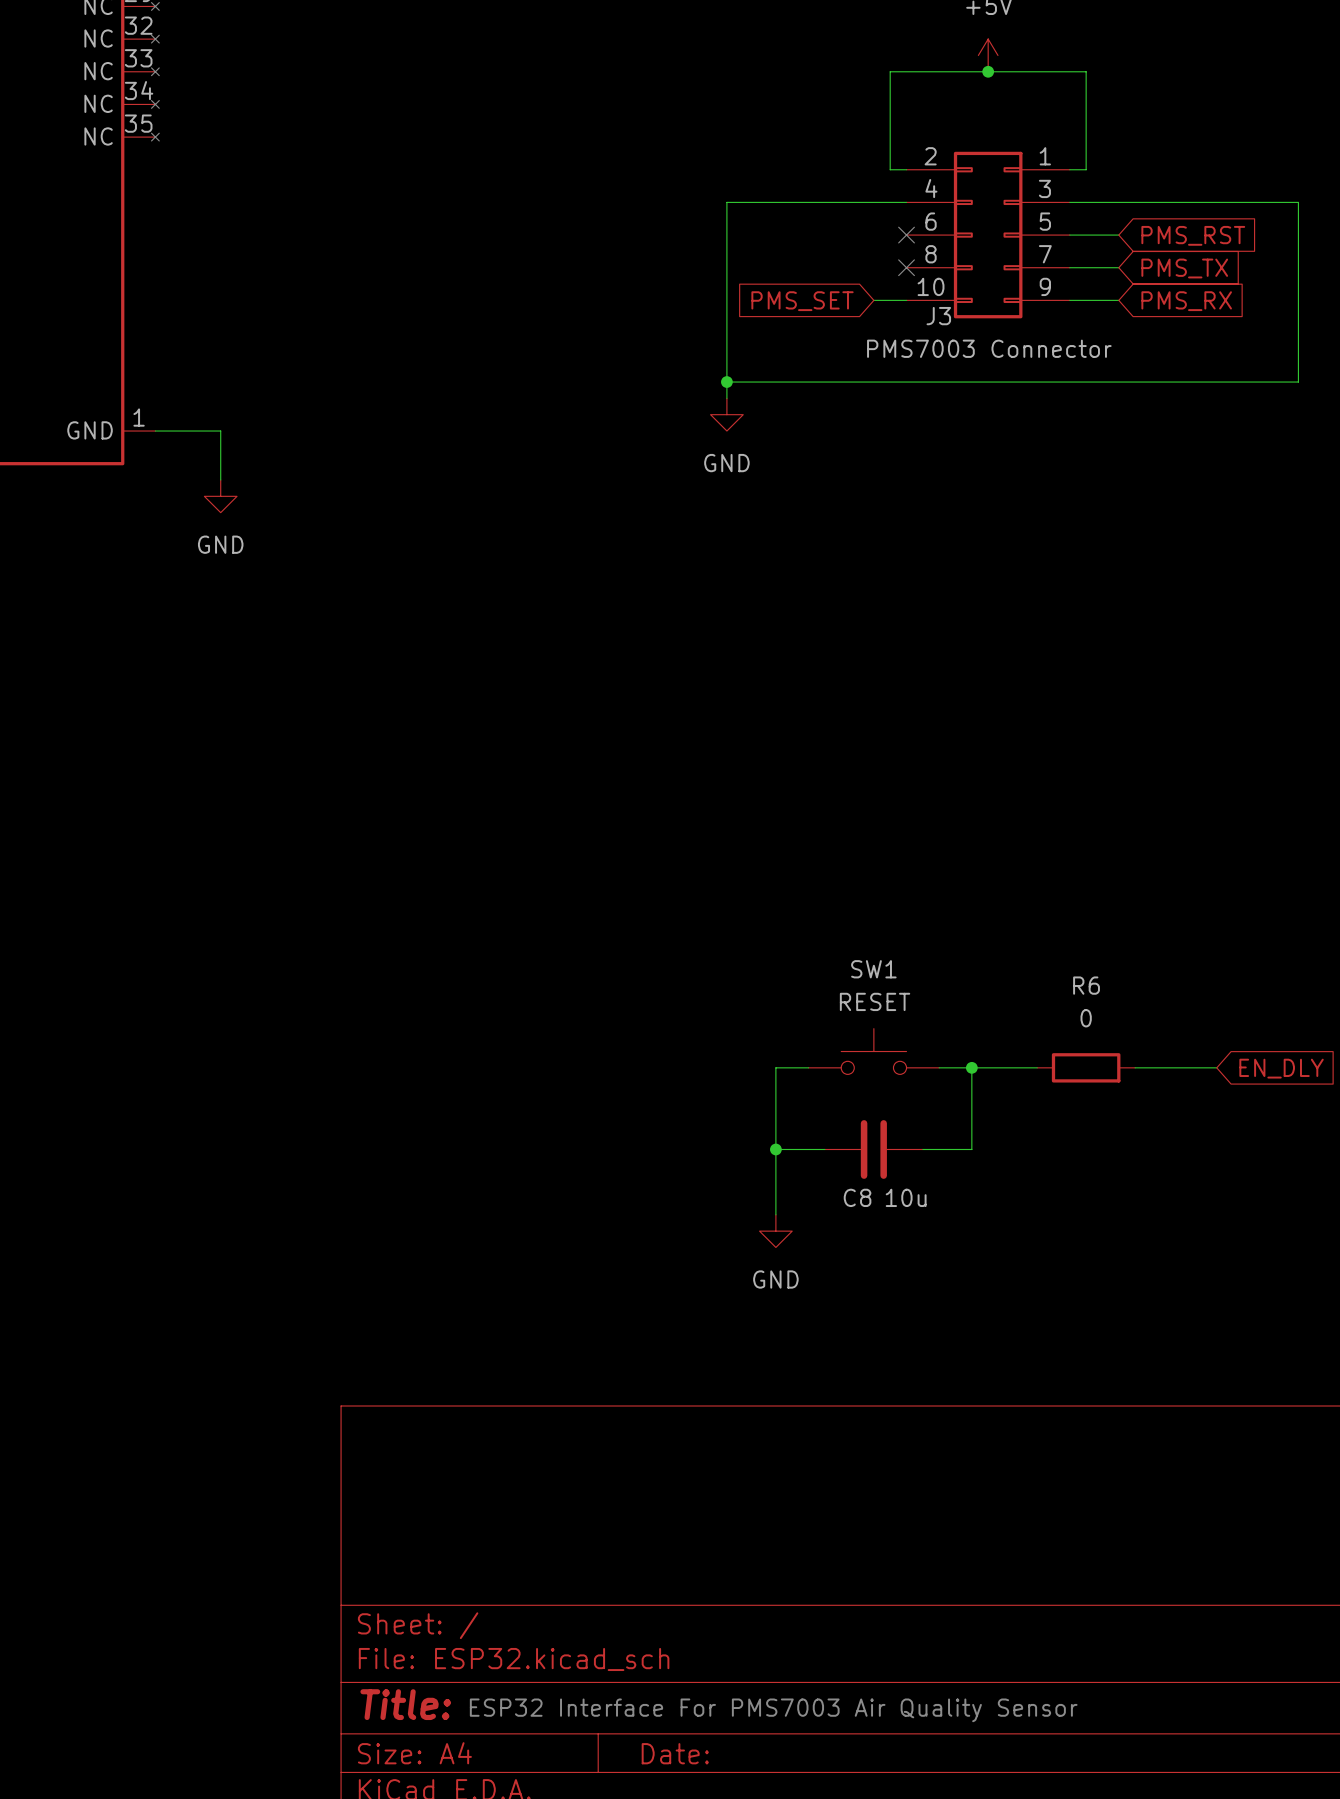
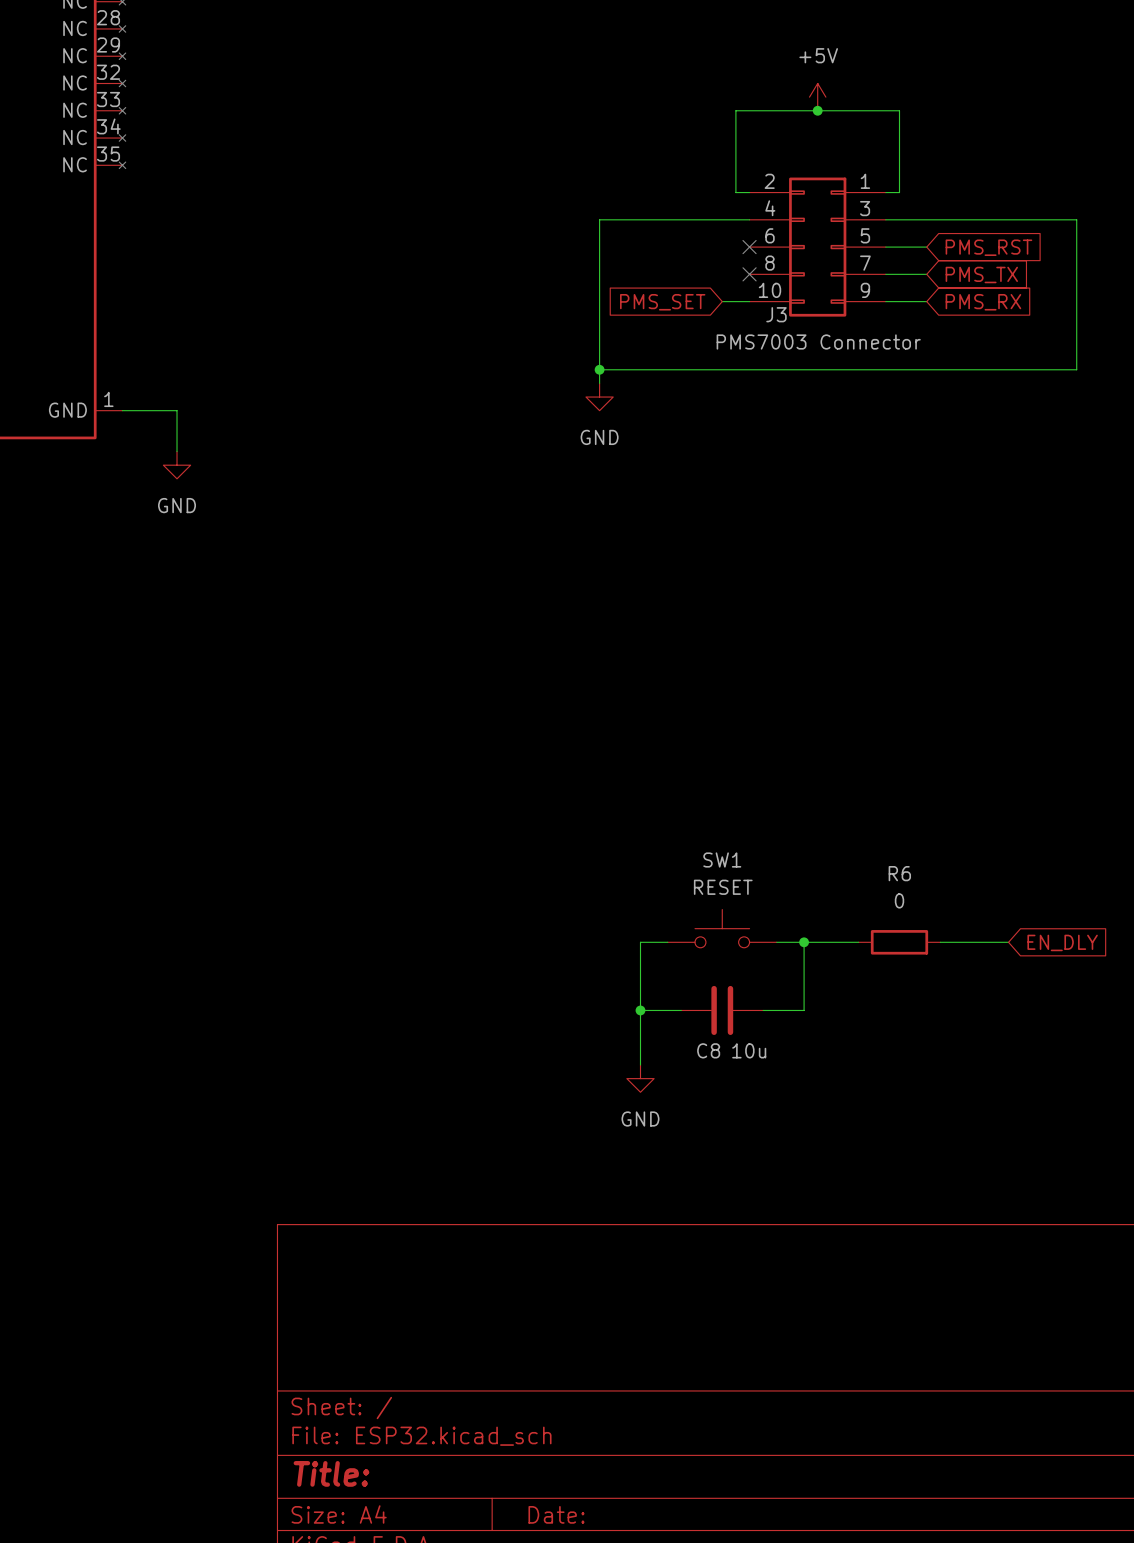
text: ESP32 Interface For PMS7003 Air Quality Sensor (773, 1710) -> none

